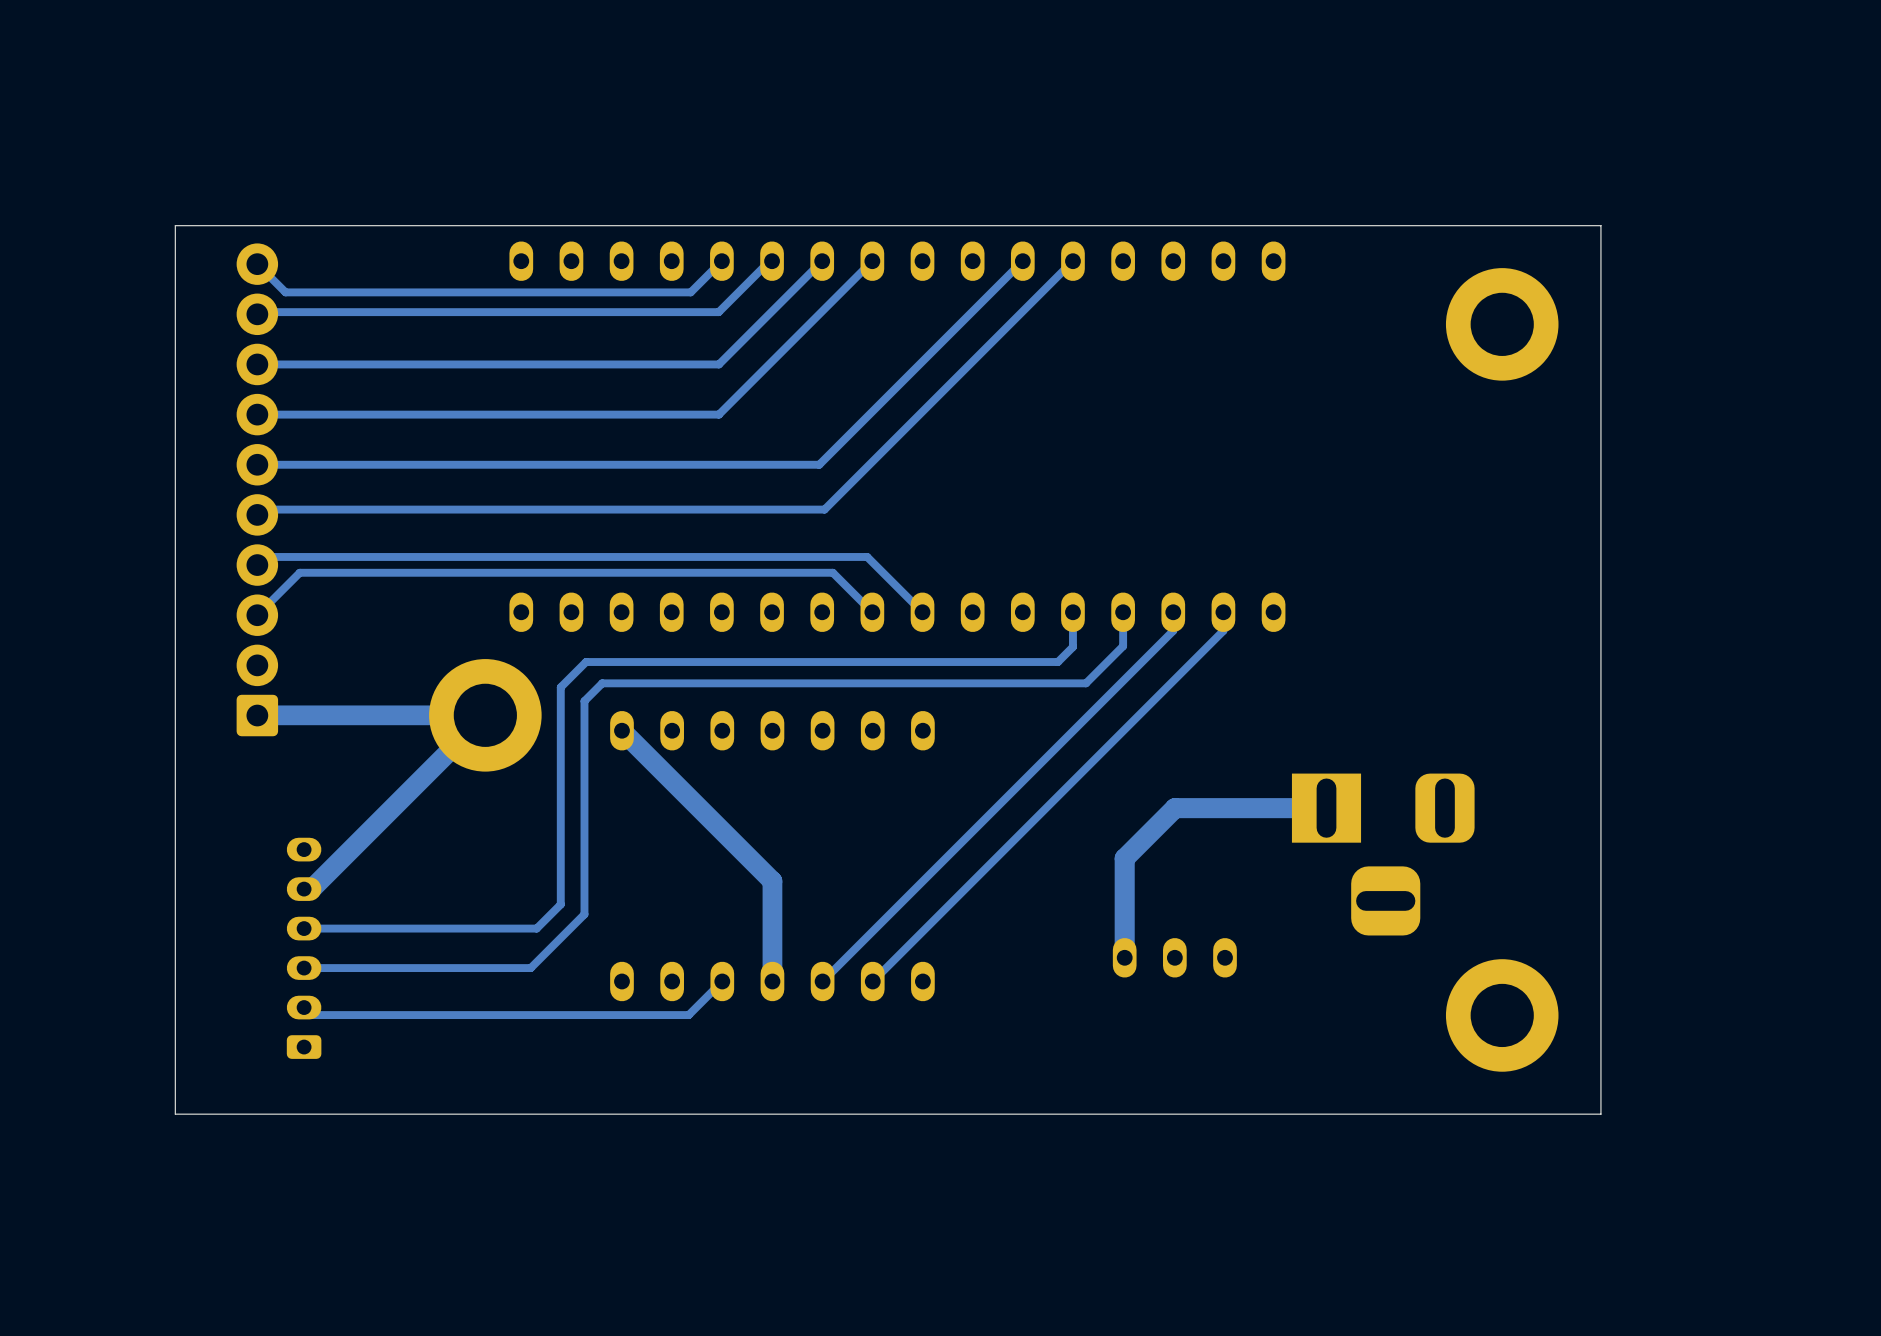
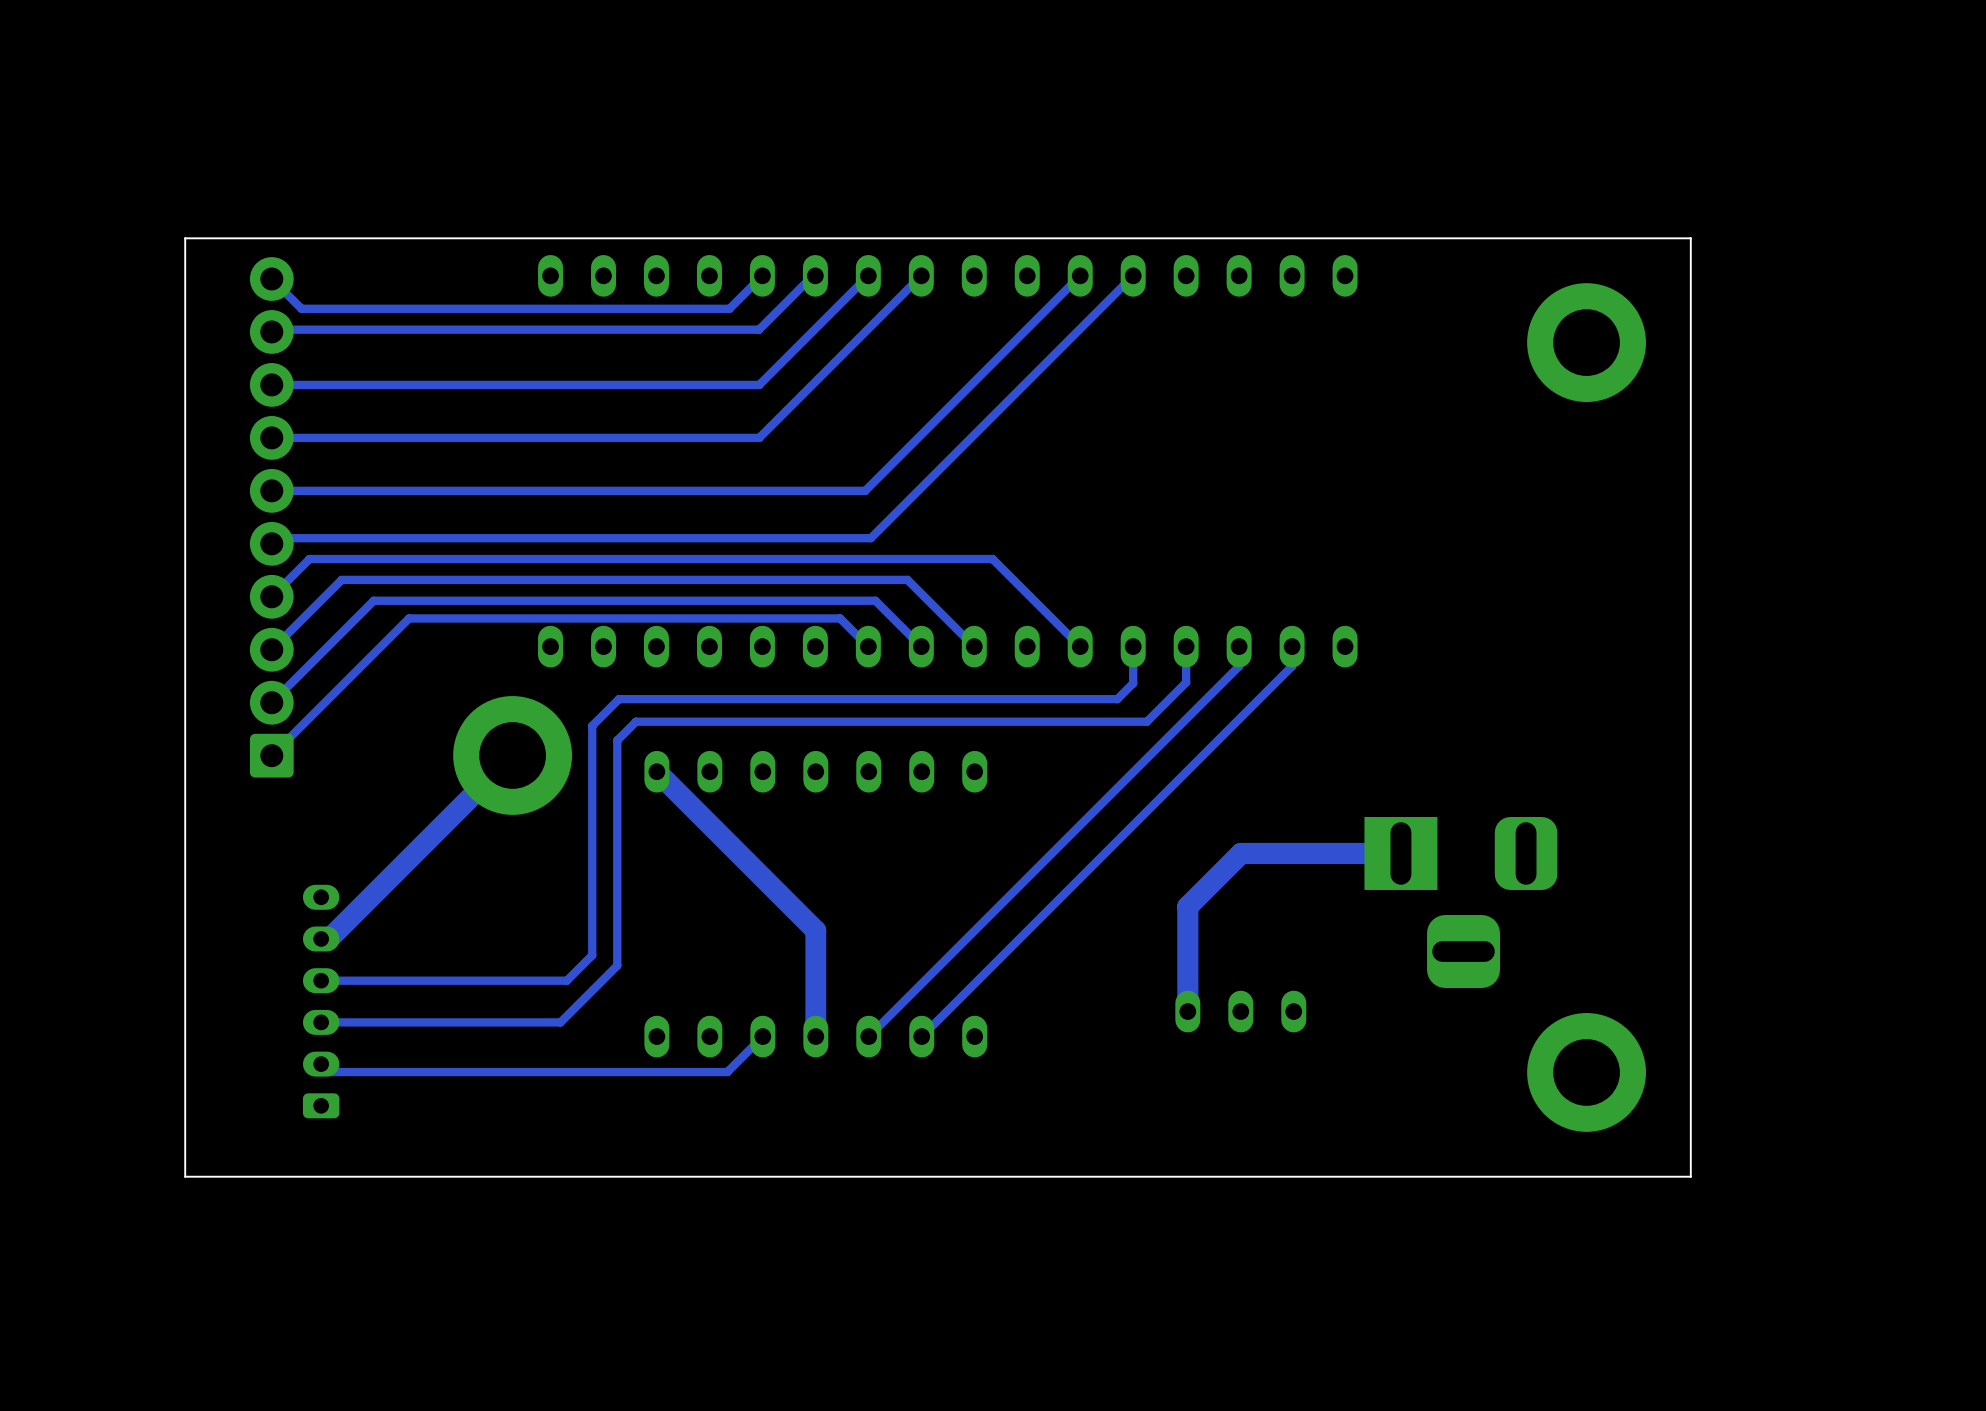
track: (867, 556) (265, 556) -> (915, 588) (907, 579) (341, 579) (316, 604)
track: none -> (271, 596) (309, 559) (992, 559) (1080, 646)
track: (832, 572) (299, 572) -> (879, 604) (875, 600) (373, 600) (271, 702)
track: (485, 715) (257, 715) -> (868, 646) (840, 618) (409, 618) (271, 755)

